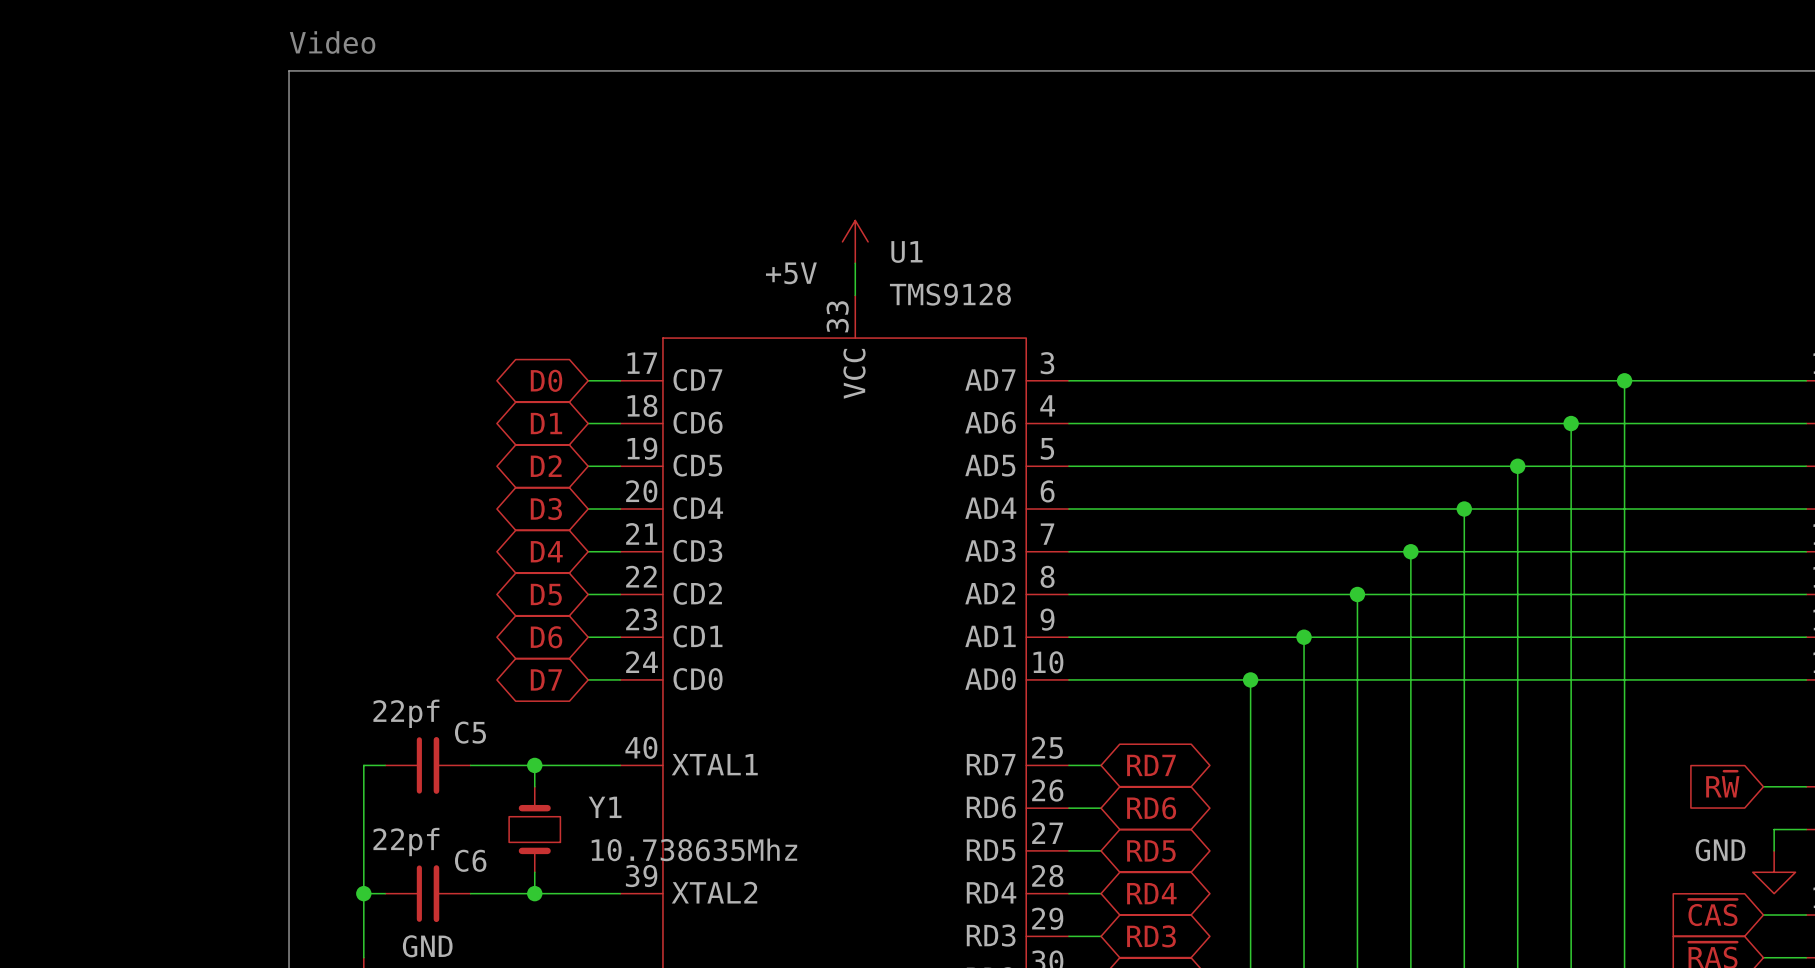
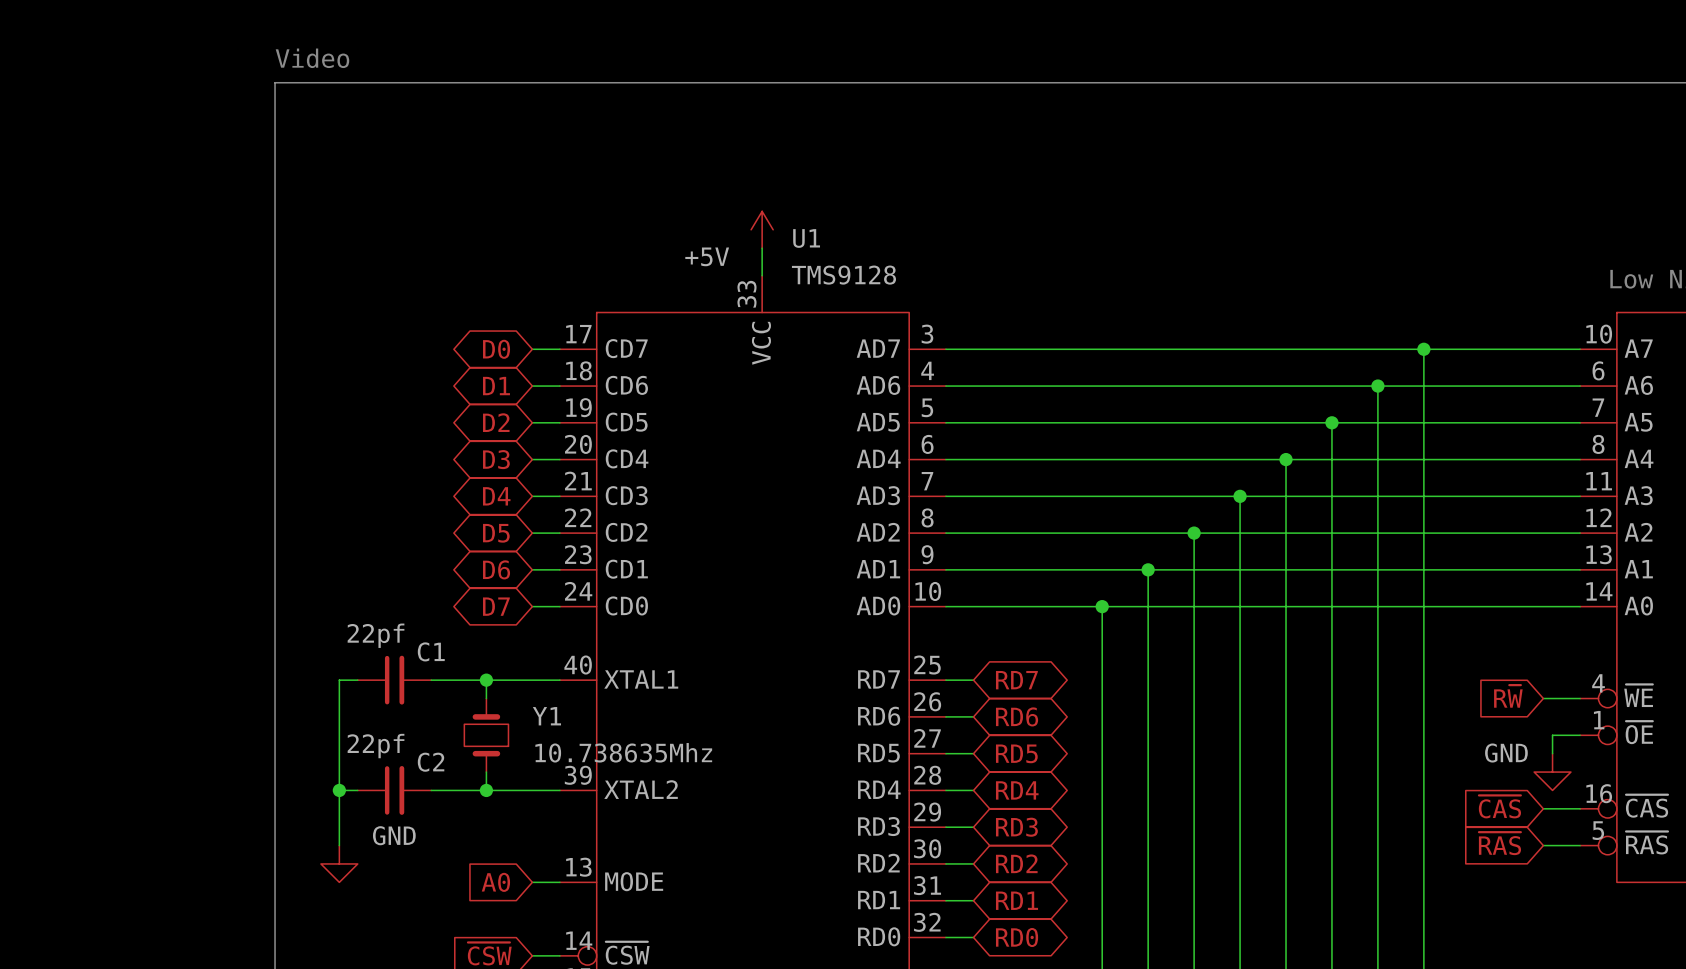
C5 name: C5 (470, 732) -> C1 (431, 651)
C6 name: C6 (470, 860) -> C2 (431, 762)

